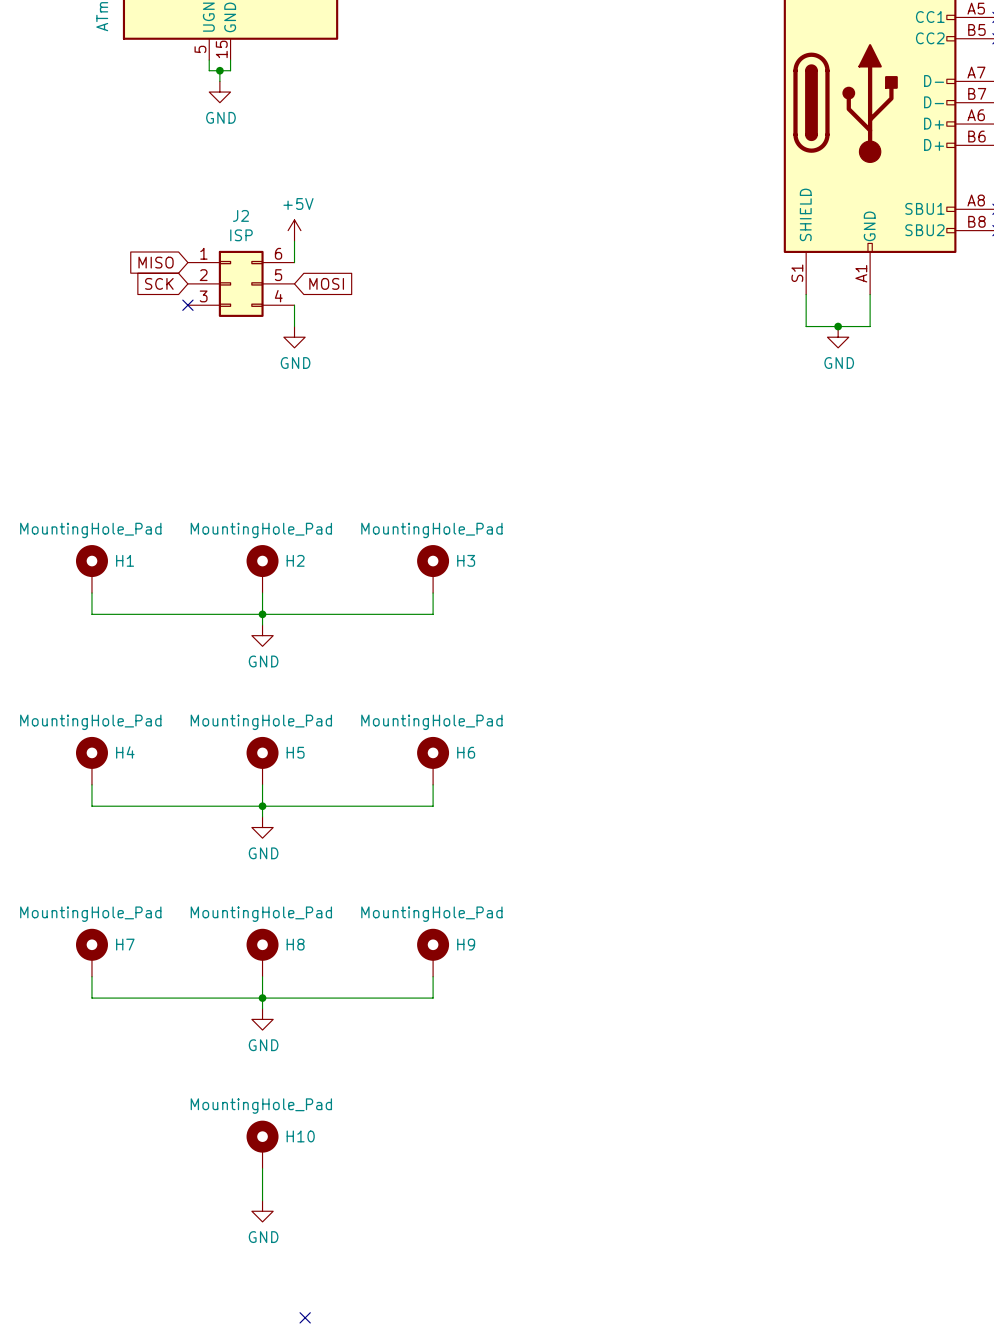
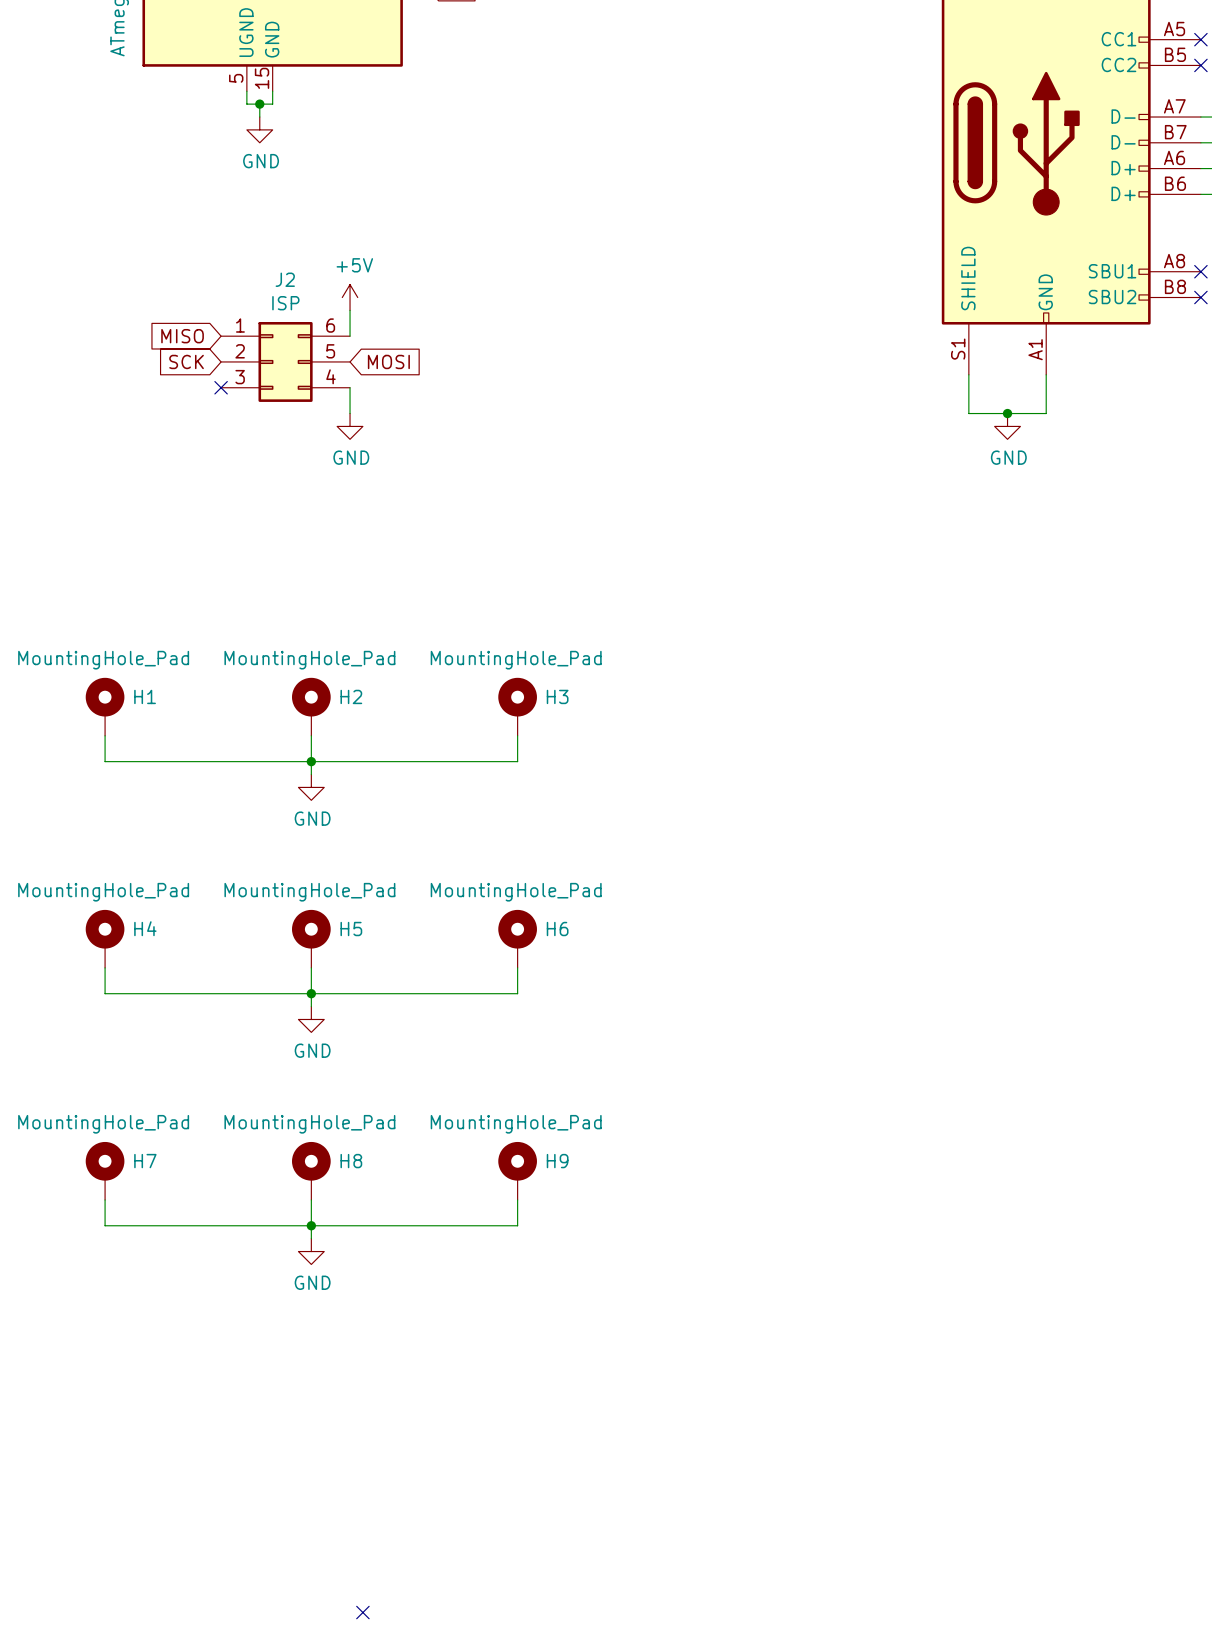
H10: MountingHole_Pad (262, 1144) -> none
wire: (262, 1168) (262, 1200) -> none
power symbol: GND (262, 1211) -> none

